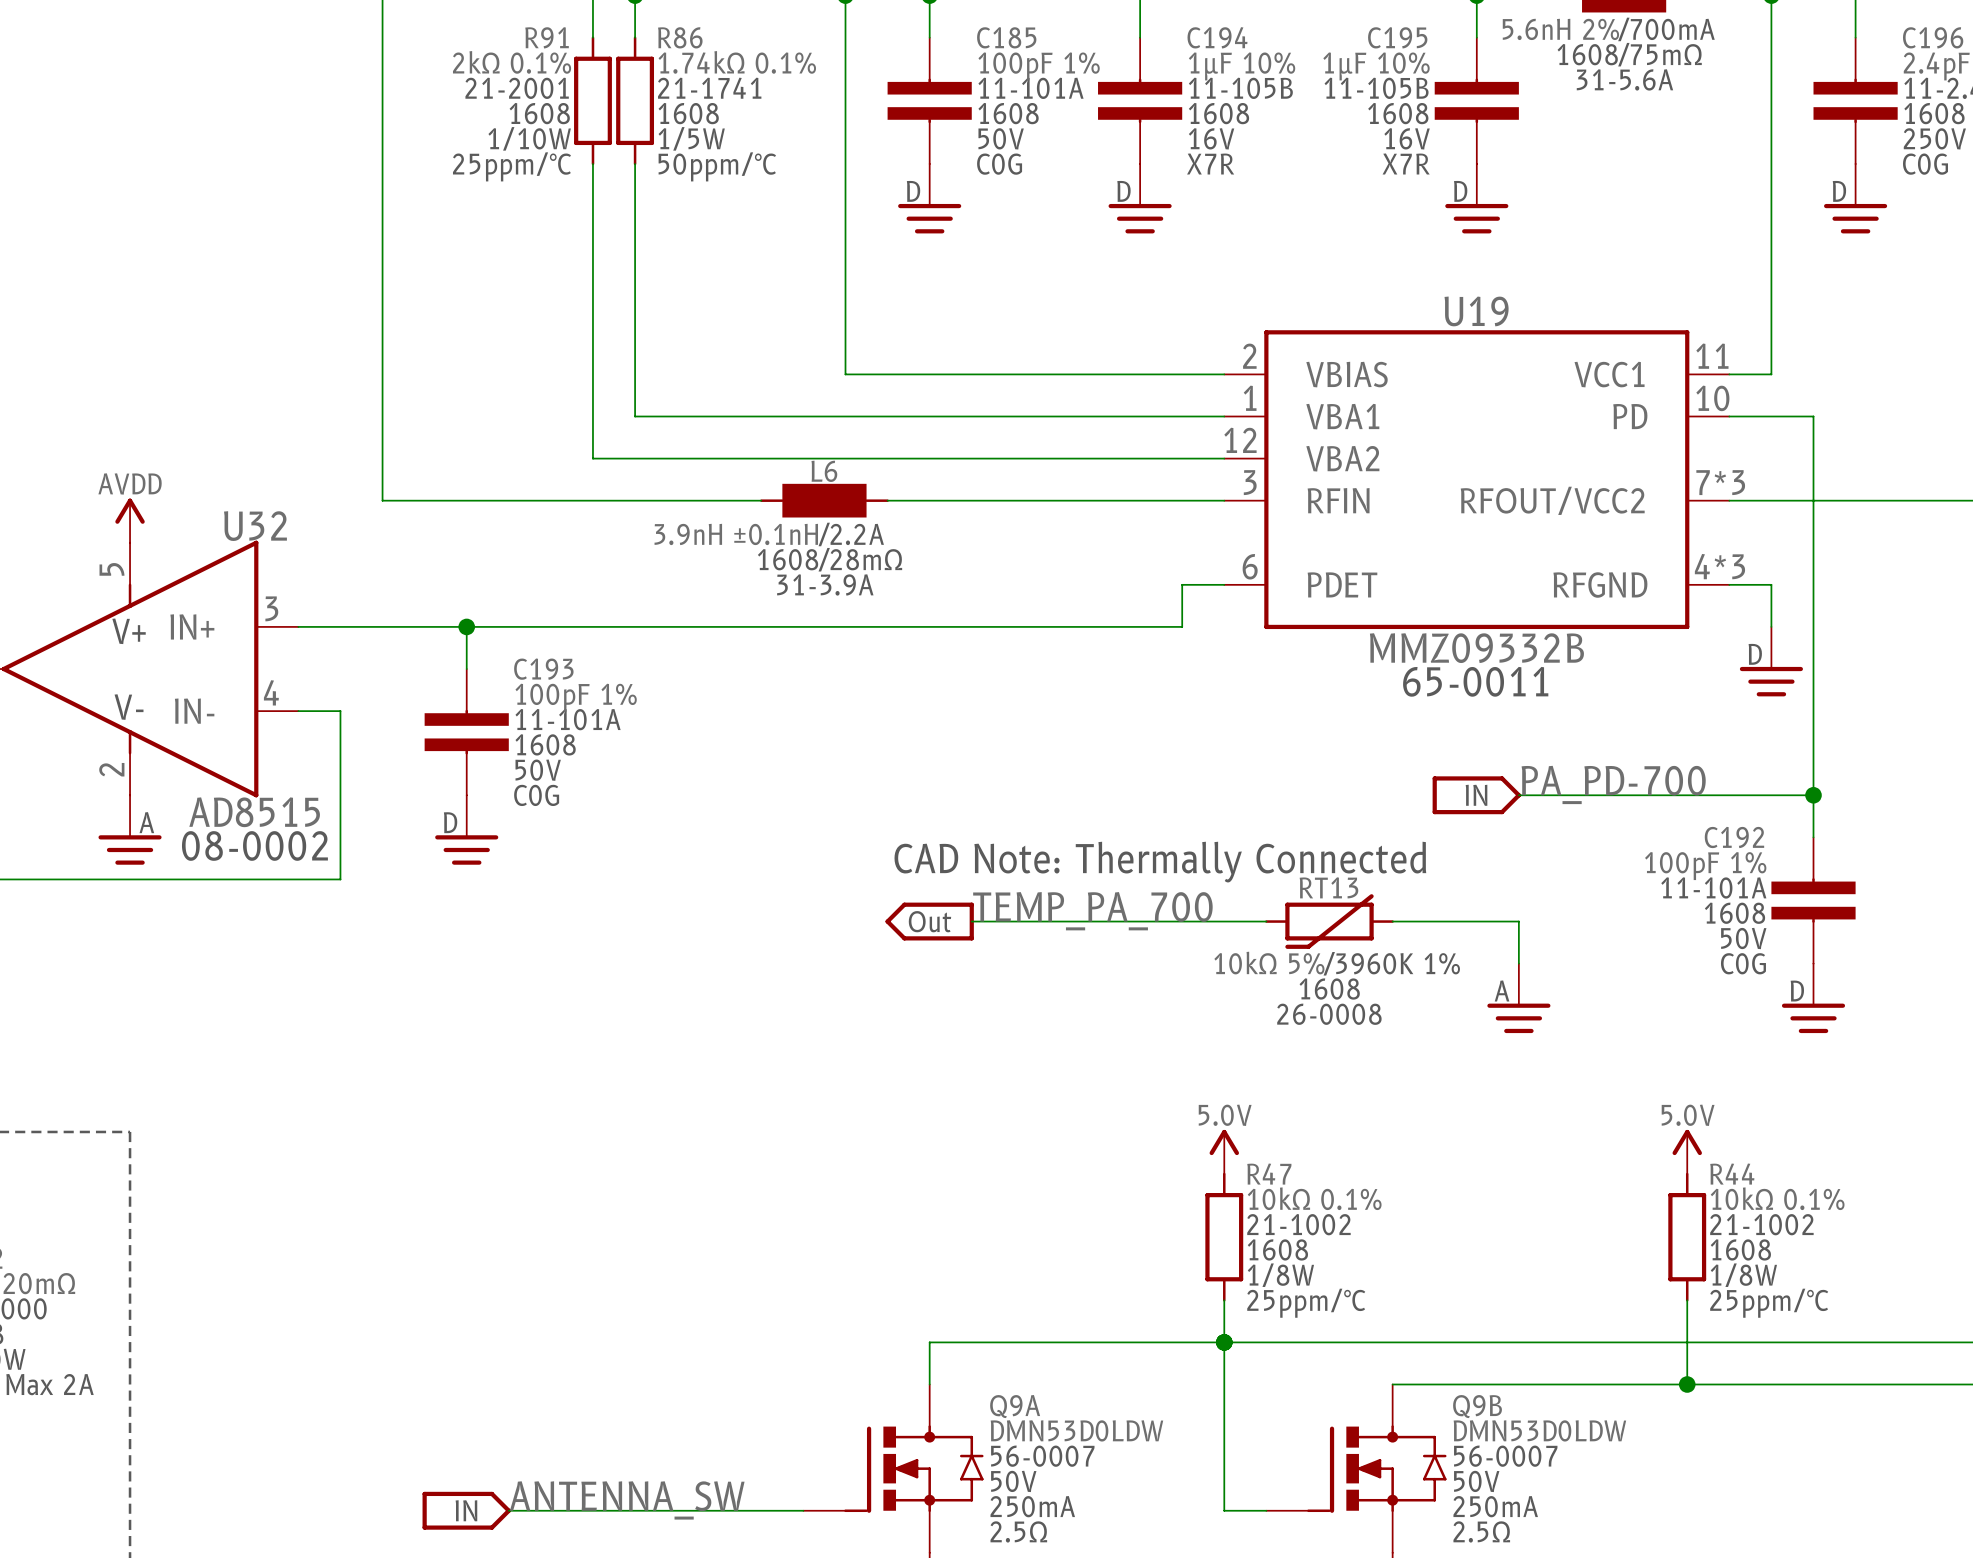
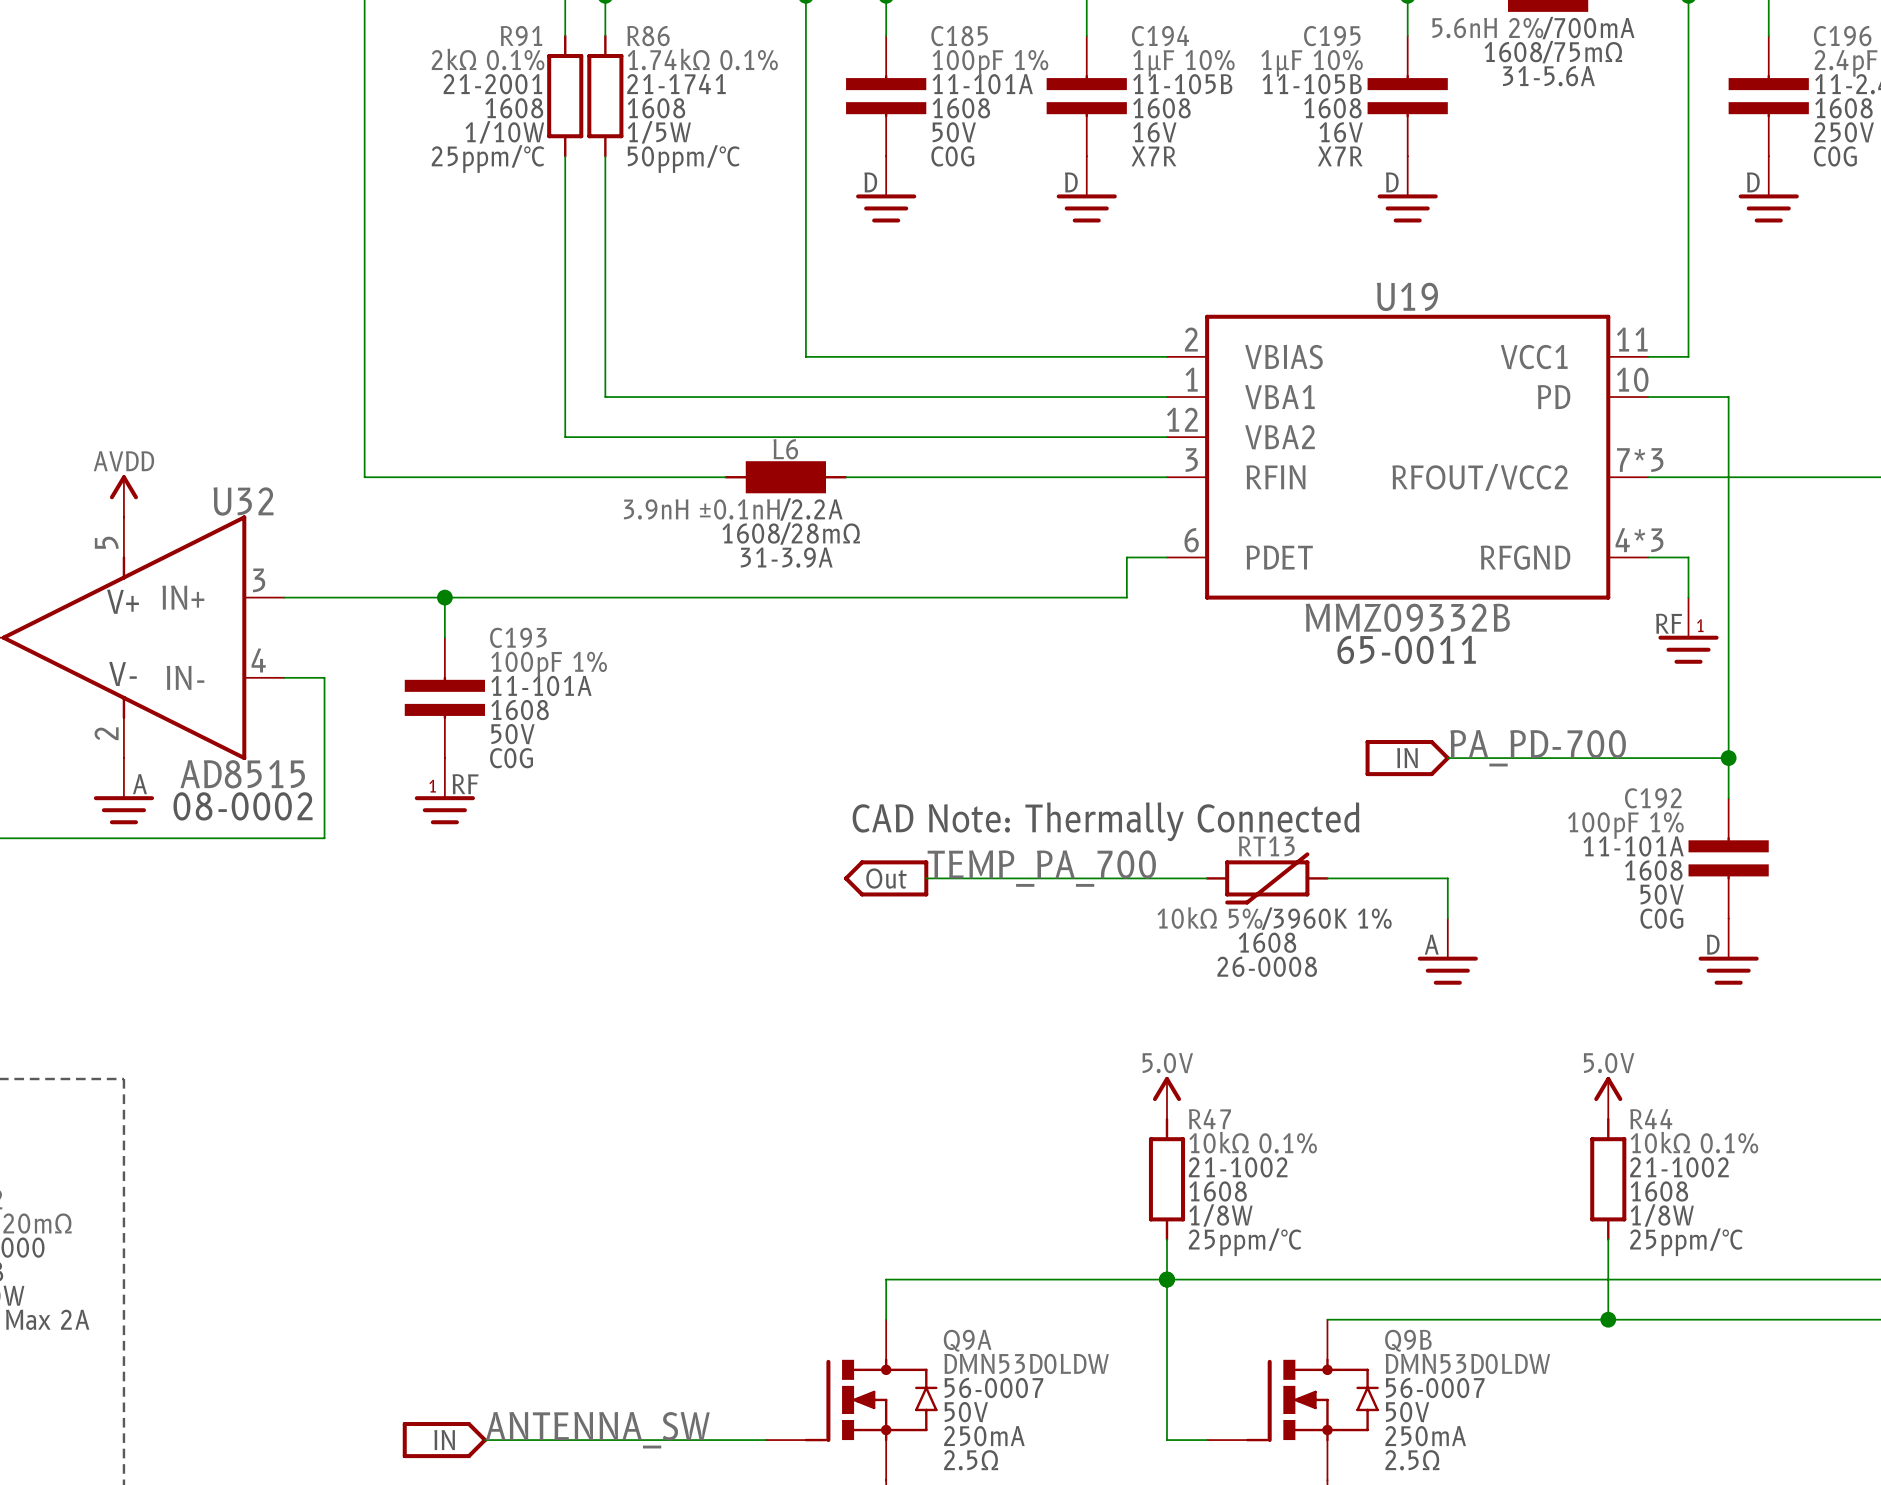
power symbol text: none -> RF (1669, 623)
power symbol text: D (1755, 654) -> none
power symbol text: none -> 1 (1700, 625)
power symbol text: D (450, 822) -> none
power symbol text: none -> RF (465, 784)
power symbol text: none -> 1 (432, 786)

